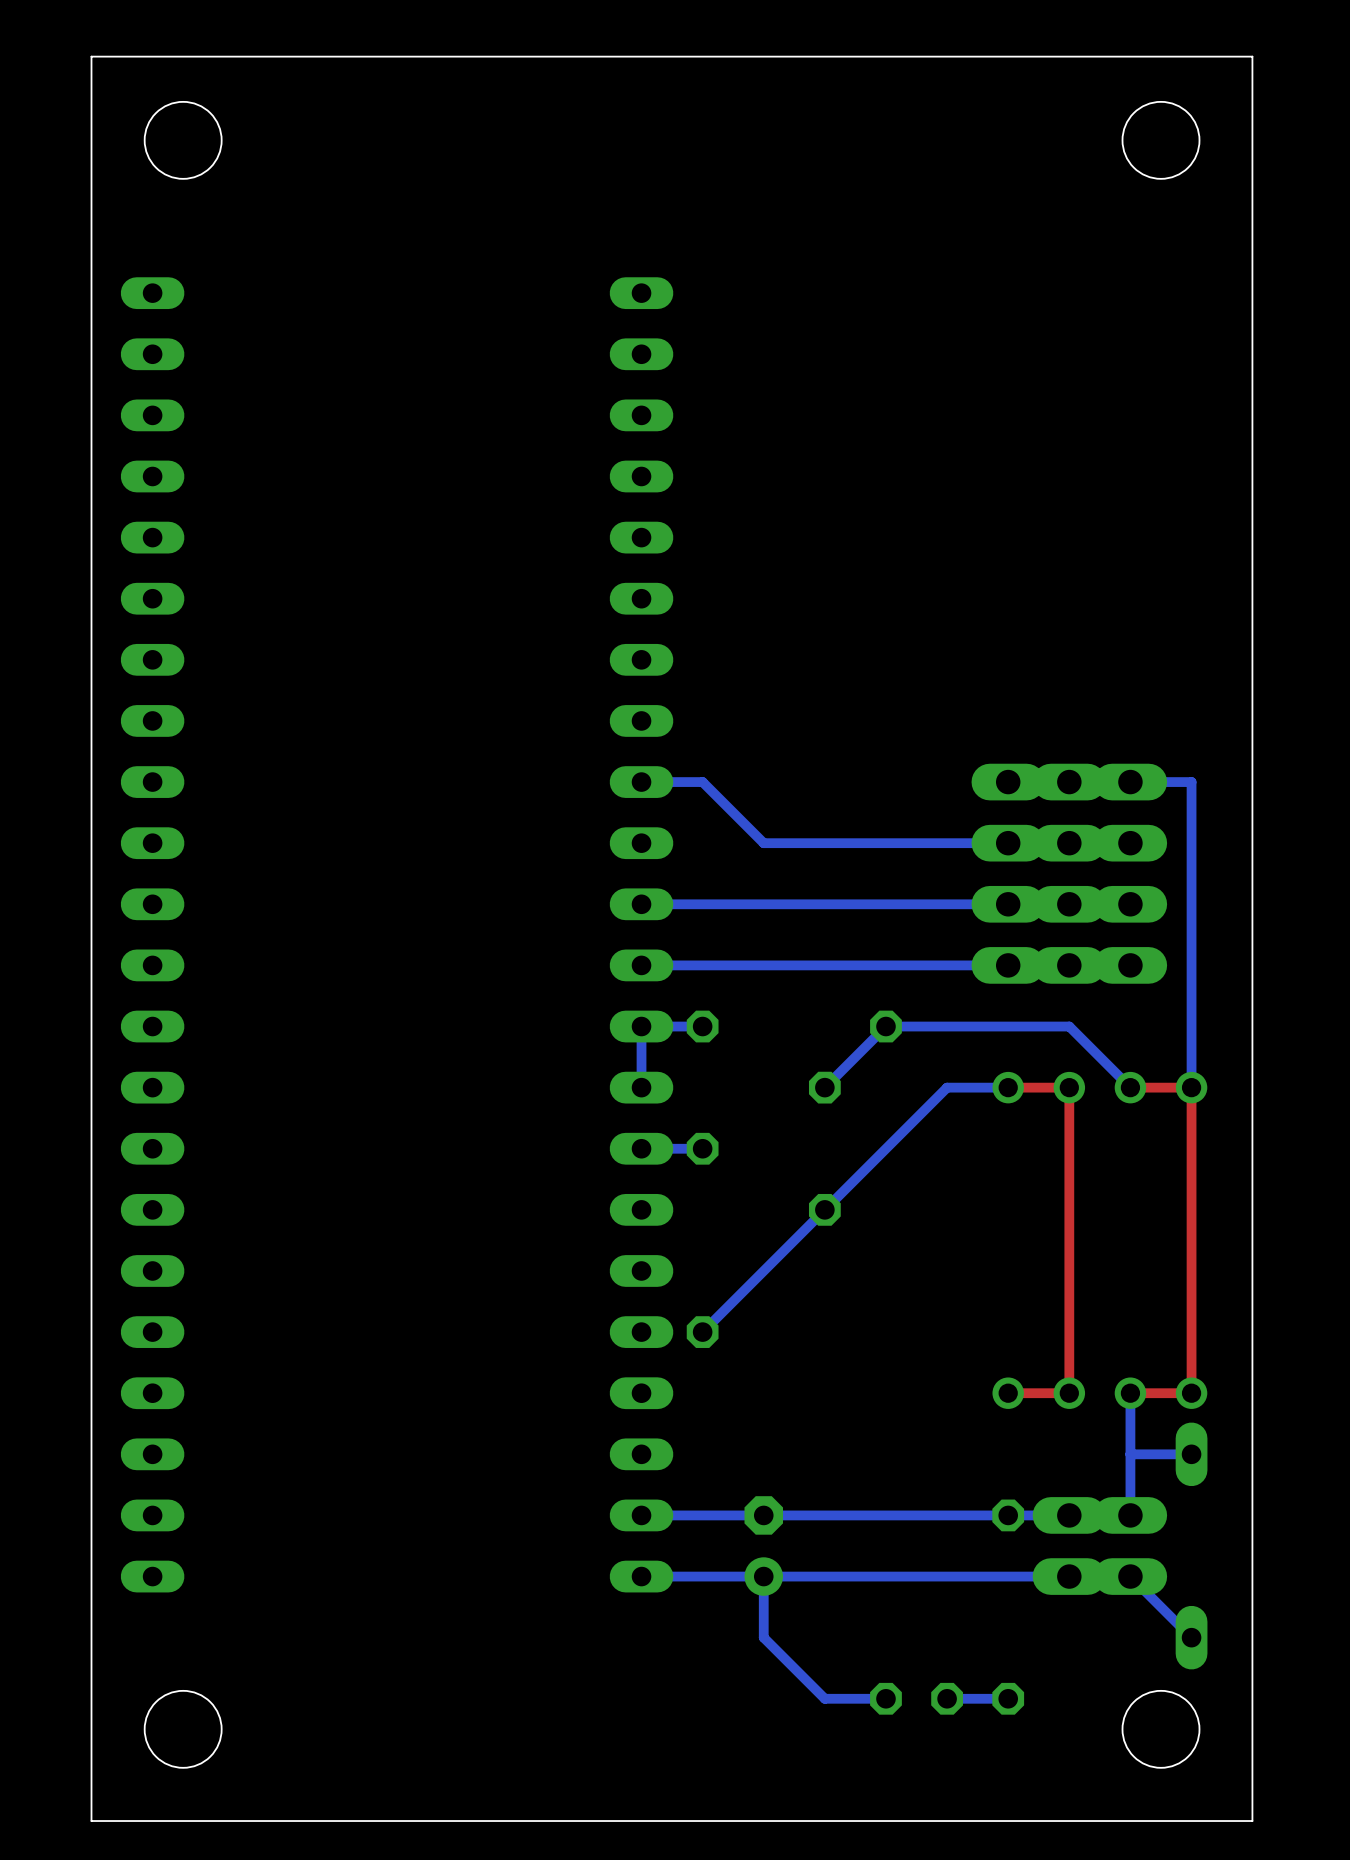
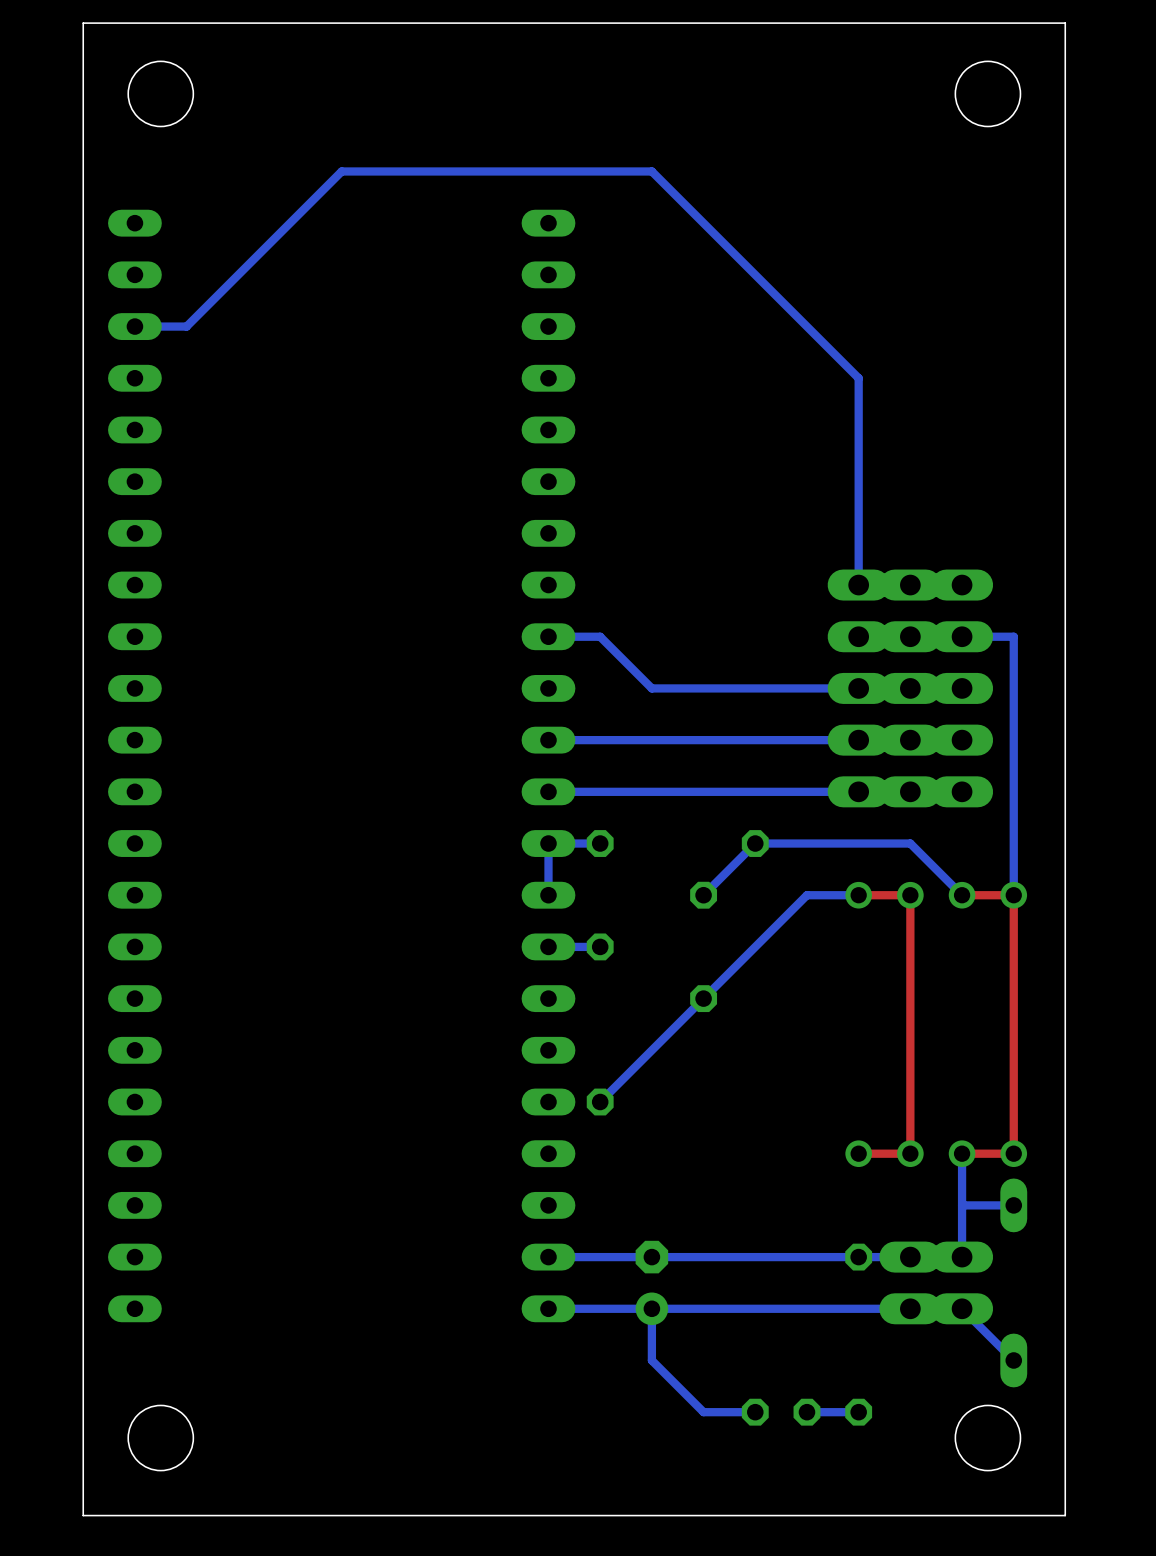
bottom track: none -> (134, 326) (186, 326) (341, 171) (651, 171) (858, 378) (858, 585) (962, 585)
part: none -> (858, 688)
part: none -> (910, 688)
part: none -> (962, 688)

